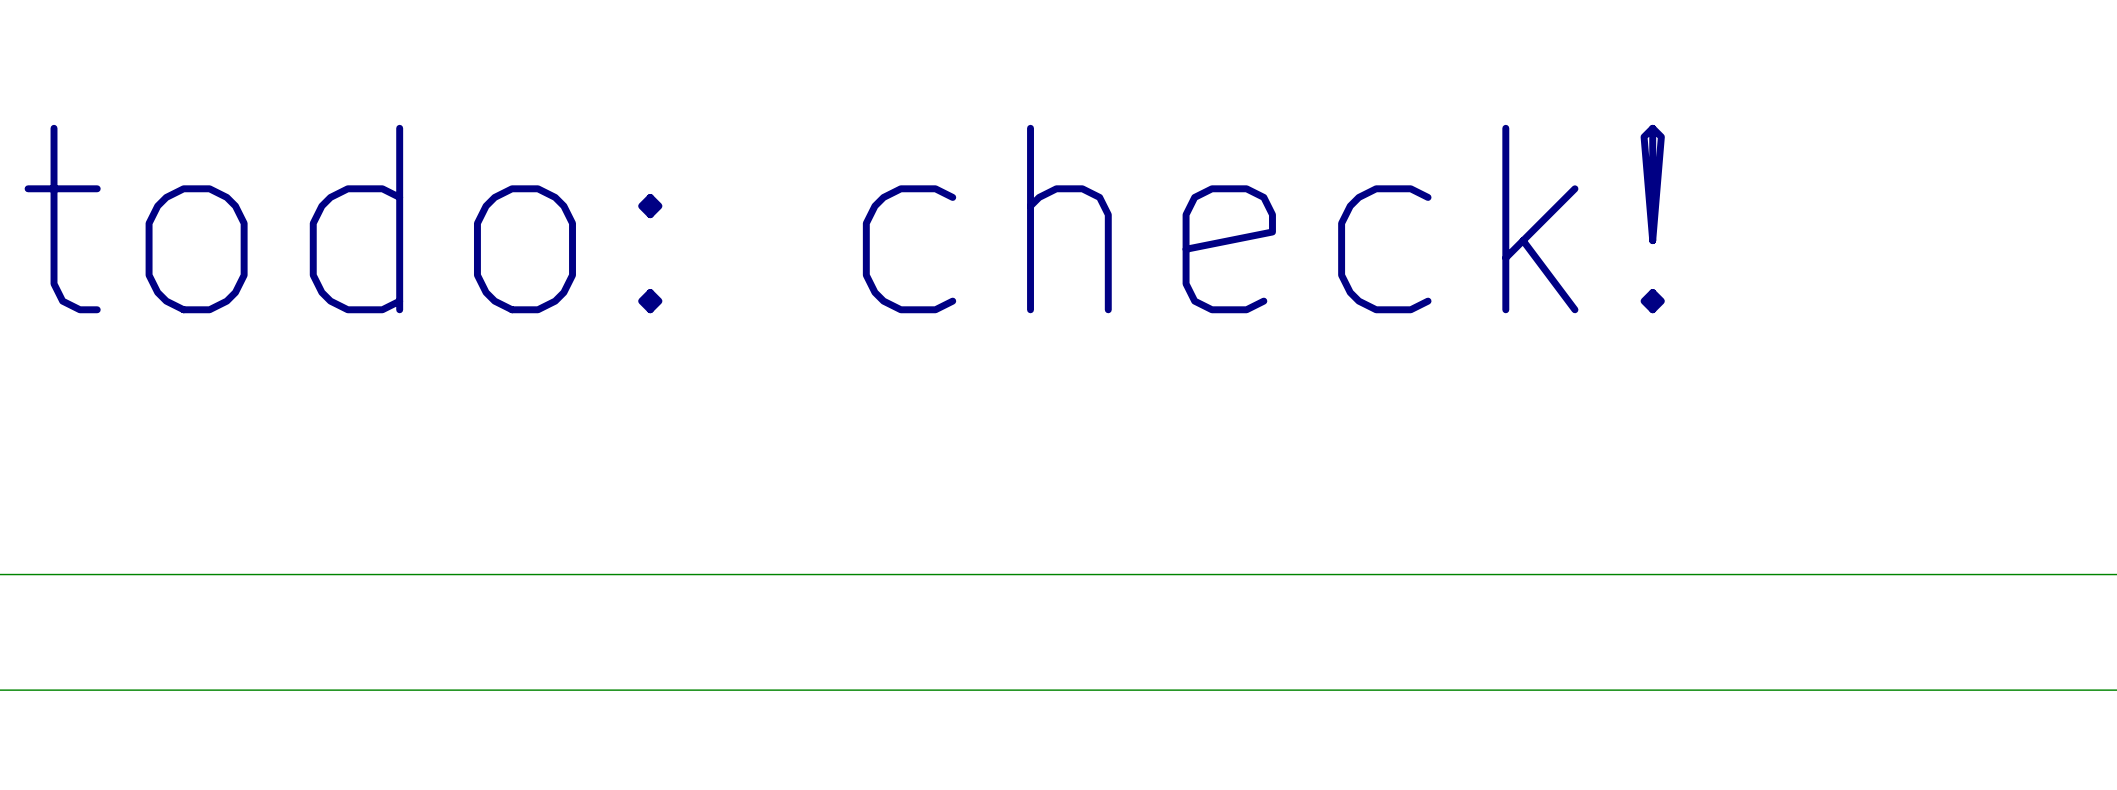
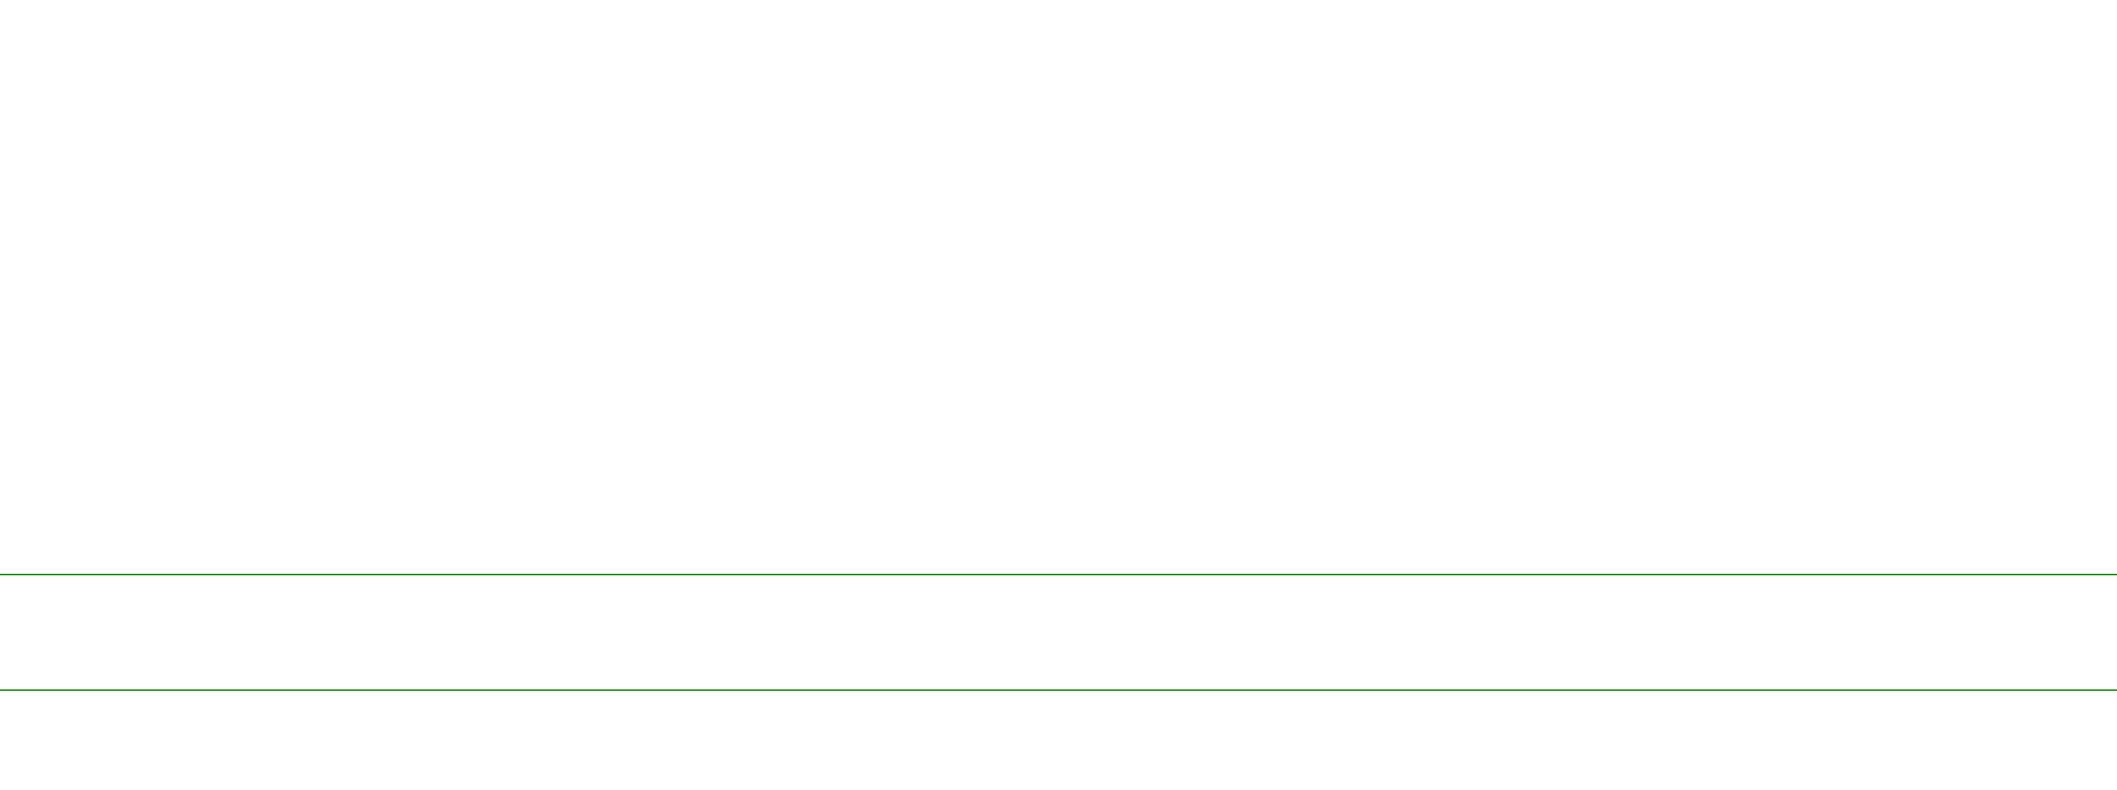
text: todo: check! (844, 219) -> none

